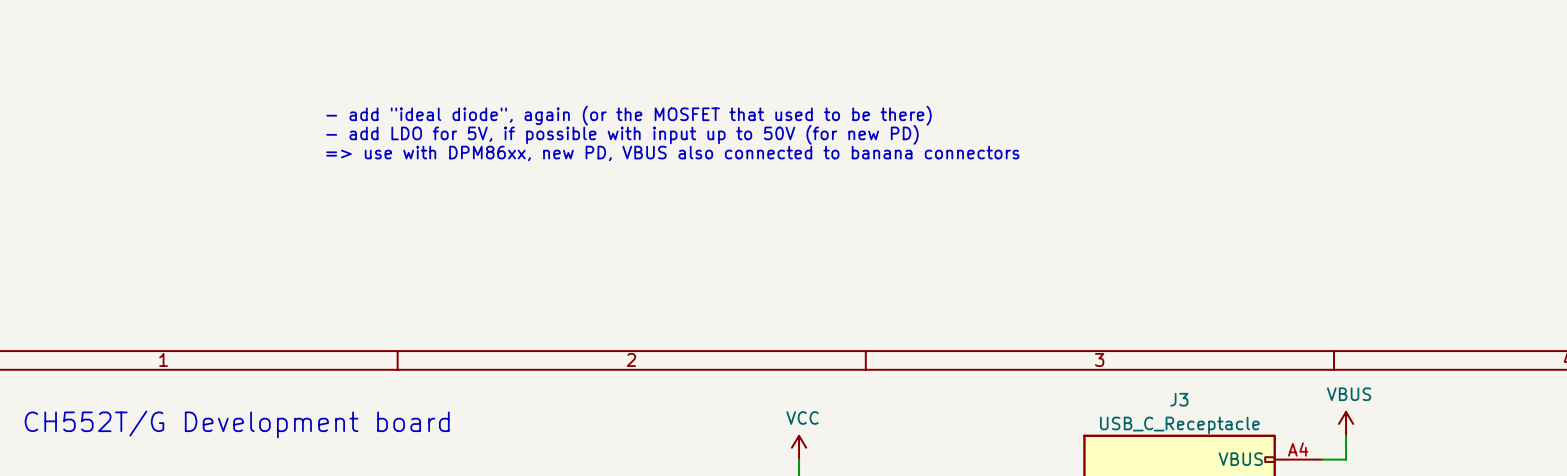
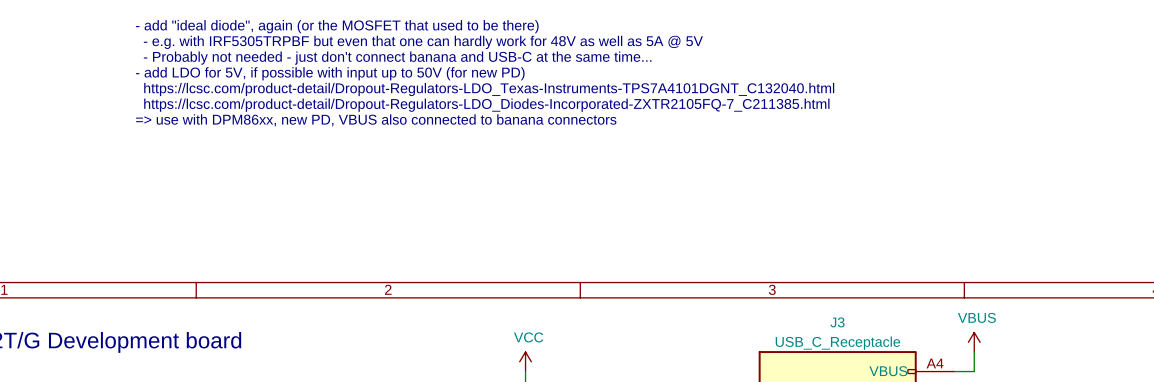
text: none -> - add "ideal diode", again (or the MOSFET that used to be there) (337, 26)
text: none -> - e.g. with IRF5305TRPBF but even that one can hardly work for 48V as well as 5A @ 5V (423, 42)
text: none -> - Probably not needed - just don't connect banana and USB-C at the same time... (397, 58)
text: none -> - add LDO for 5V, if possible with input up to 50V (for new PD) (330, 73)
text: - add "ideal diode", again (or the MOSFET that used to be there) (628, 115) -> https://lcsc.com/product-detail/Dropout-Regulators-LDO_Texas-Instruments-TPS7A4101DGNT_C132040.html (489, 89)
text: - add LDO for 5V, if possible with input up to 50V (for new PD) (622, 134) -> https://lcsc.com/product-detail/Dropout-Regulators-LDO_Diodes-Incorporated-ZXTR2105FQ-7_C211385.html (486, 105)

